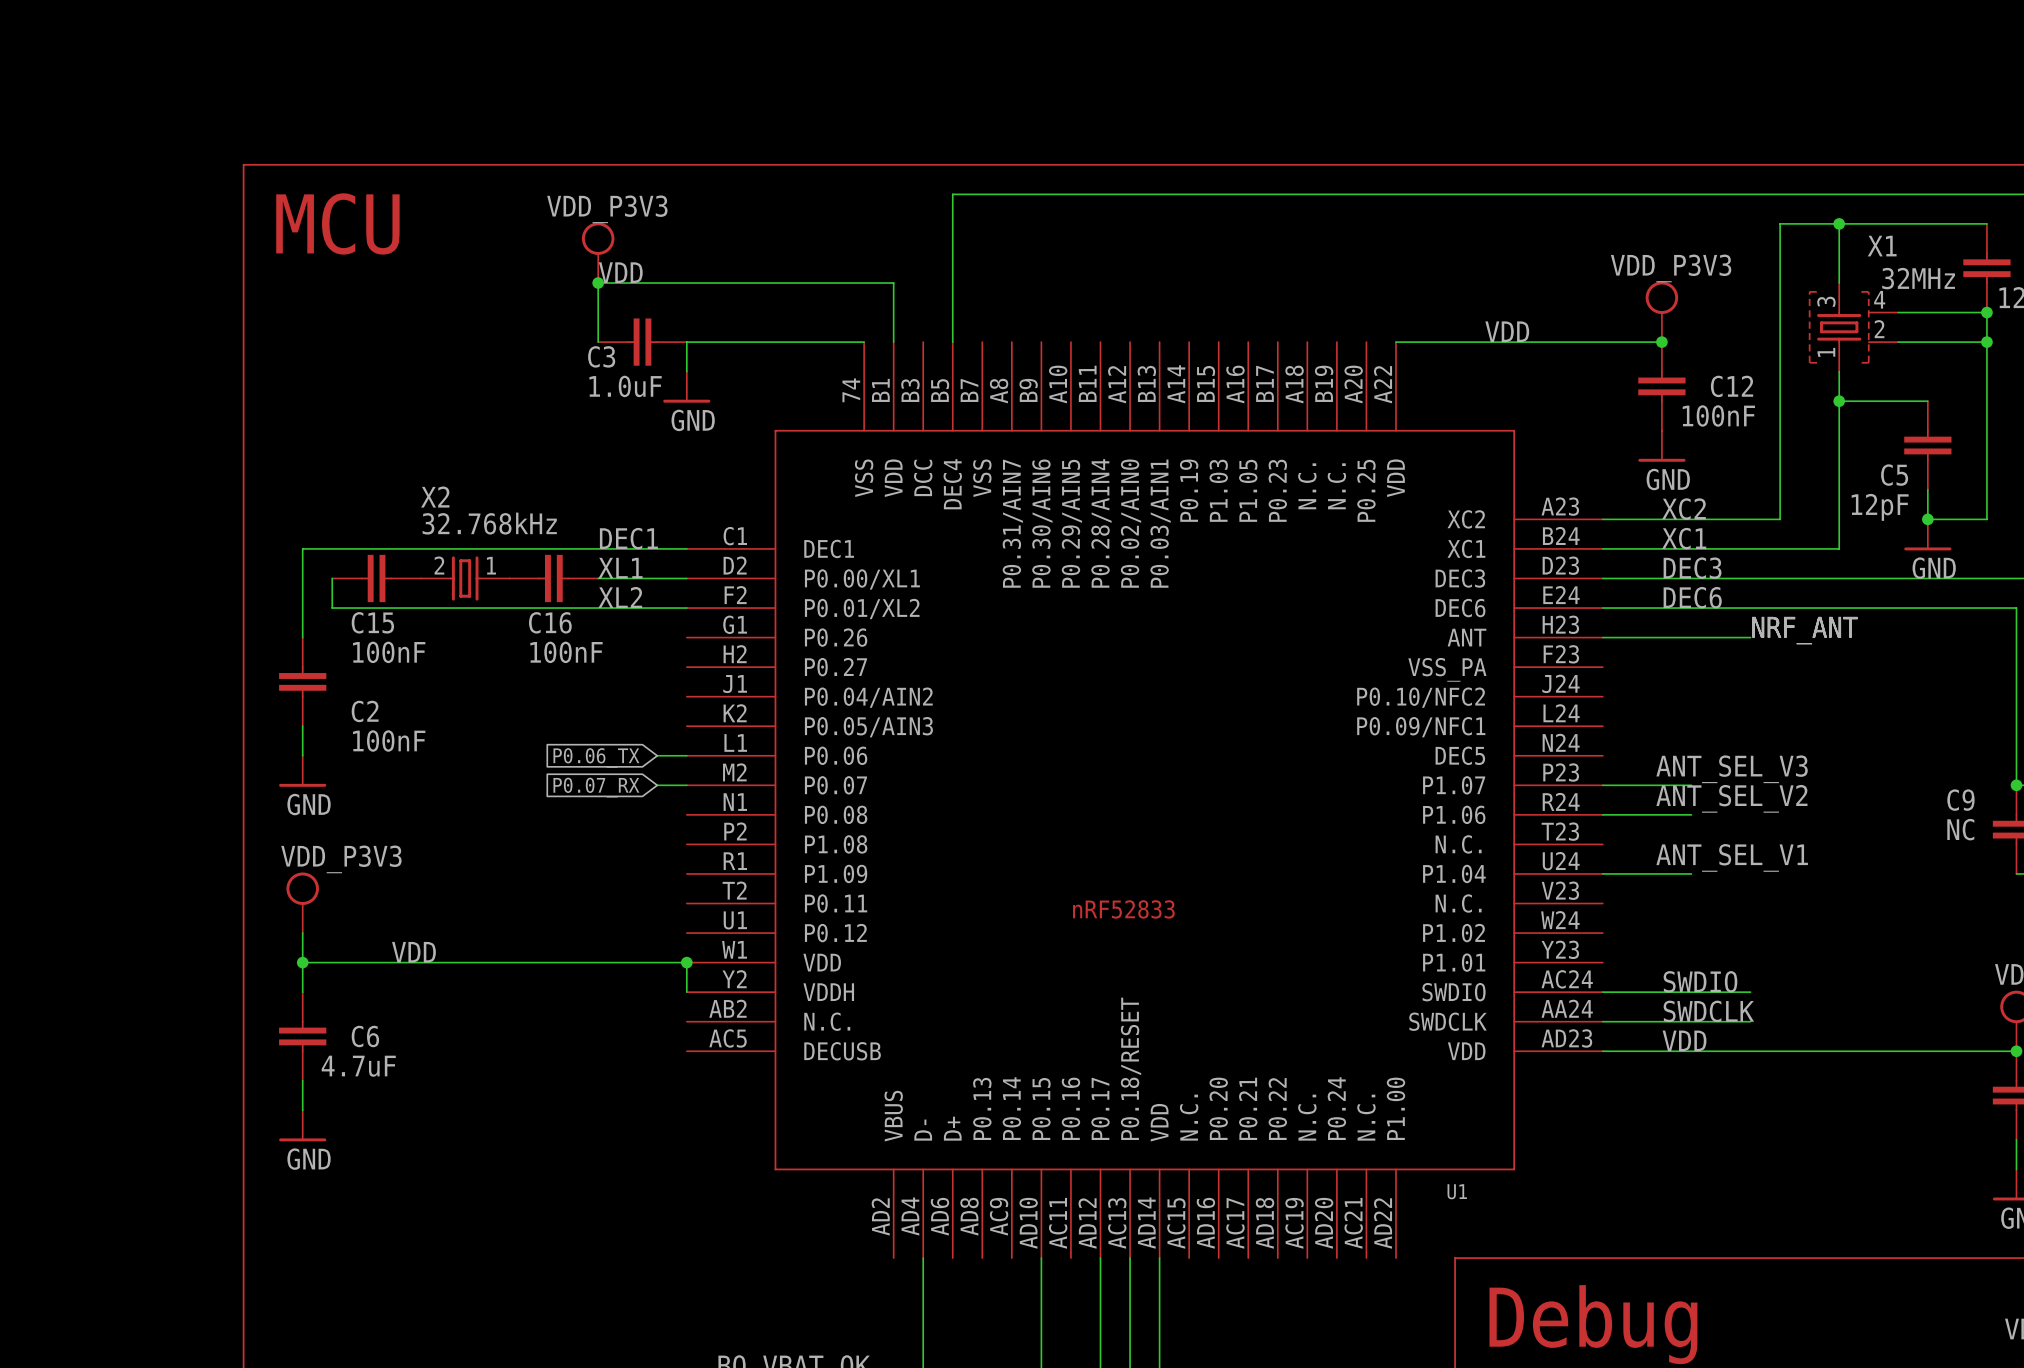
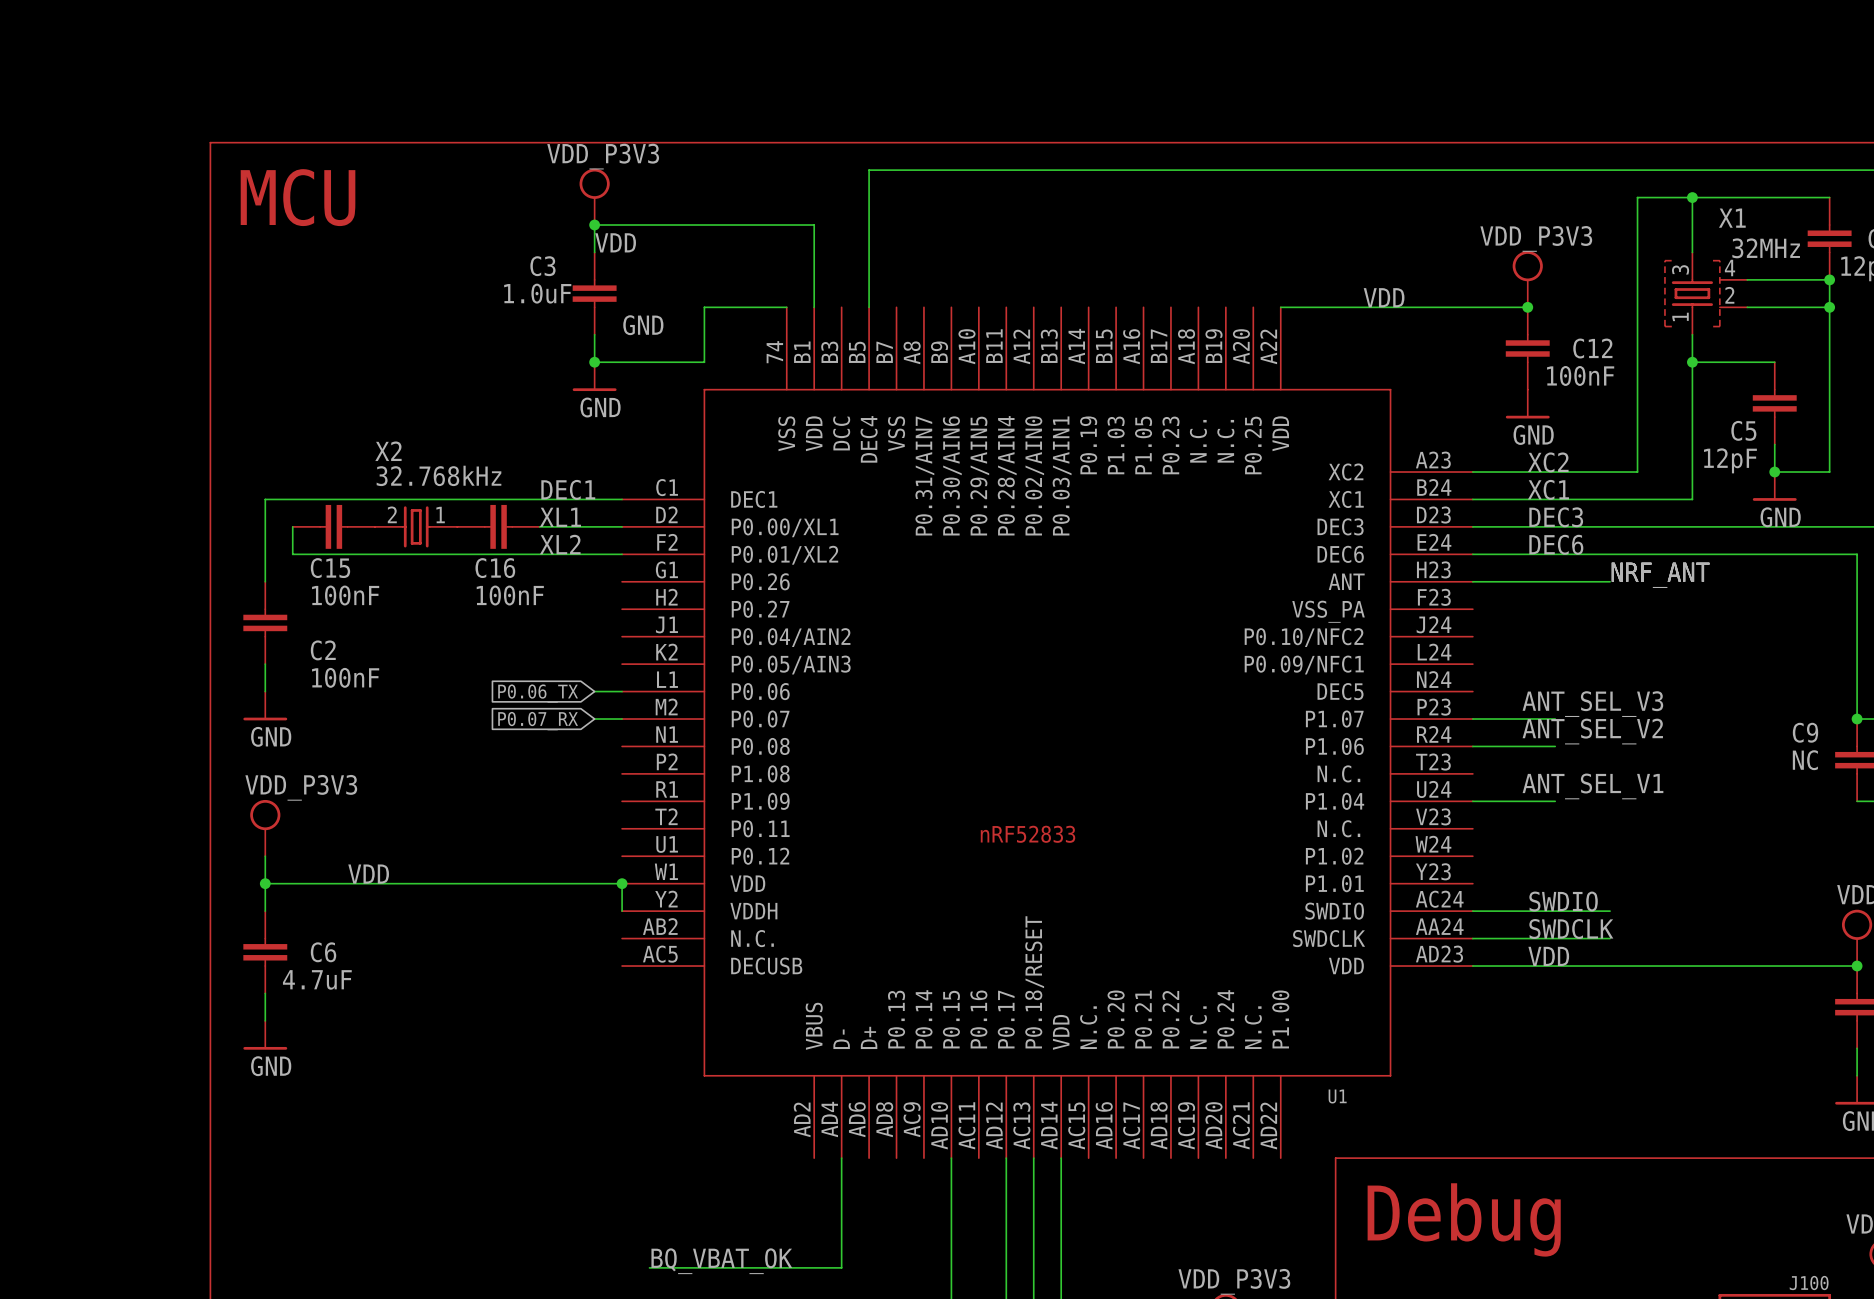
power symbol position: VDD_P3V3 (598, 252) -> VDD_P3V3 (594, 196)
junction: none -> (594, 225)
label position: VDD (620, 272) -> VDD (615, 242)
junction: (598, 283) -> none
wire: (893, 283) (598, 283) (598, 342) -> (814, 252) (814, 225) (594, 225) (594, 252)
C3 rotation: 0° (642, 342) -> 90° clockwise (594, 293)
wire: (775, 342) (686, 342) (686, 371) -> (704, 307) (704, 362) (594, 362) (594, 334)
C3 name position: C3 (601, 356) -> C3 (542, 266)
label: none -> GND (643, 325)
power symbol position: GND (686, 387) -> GND (594, 376)
junction: none -> (594, 362)

